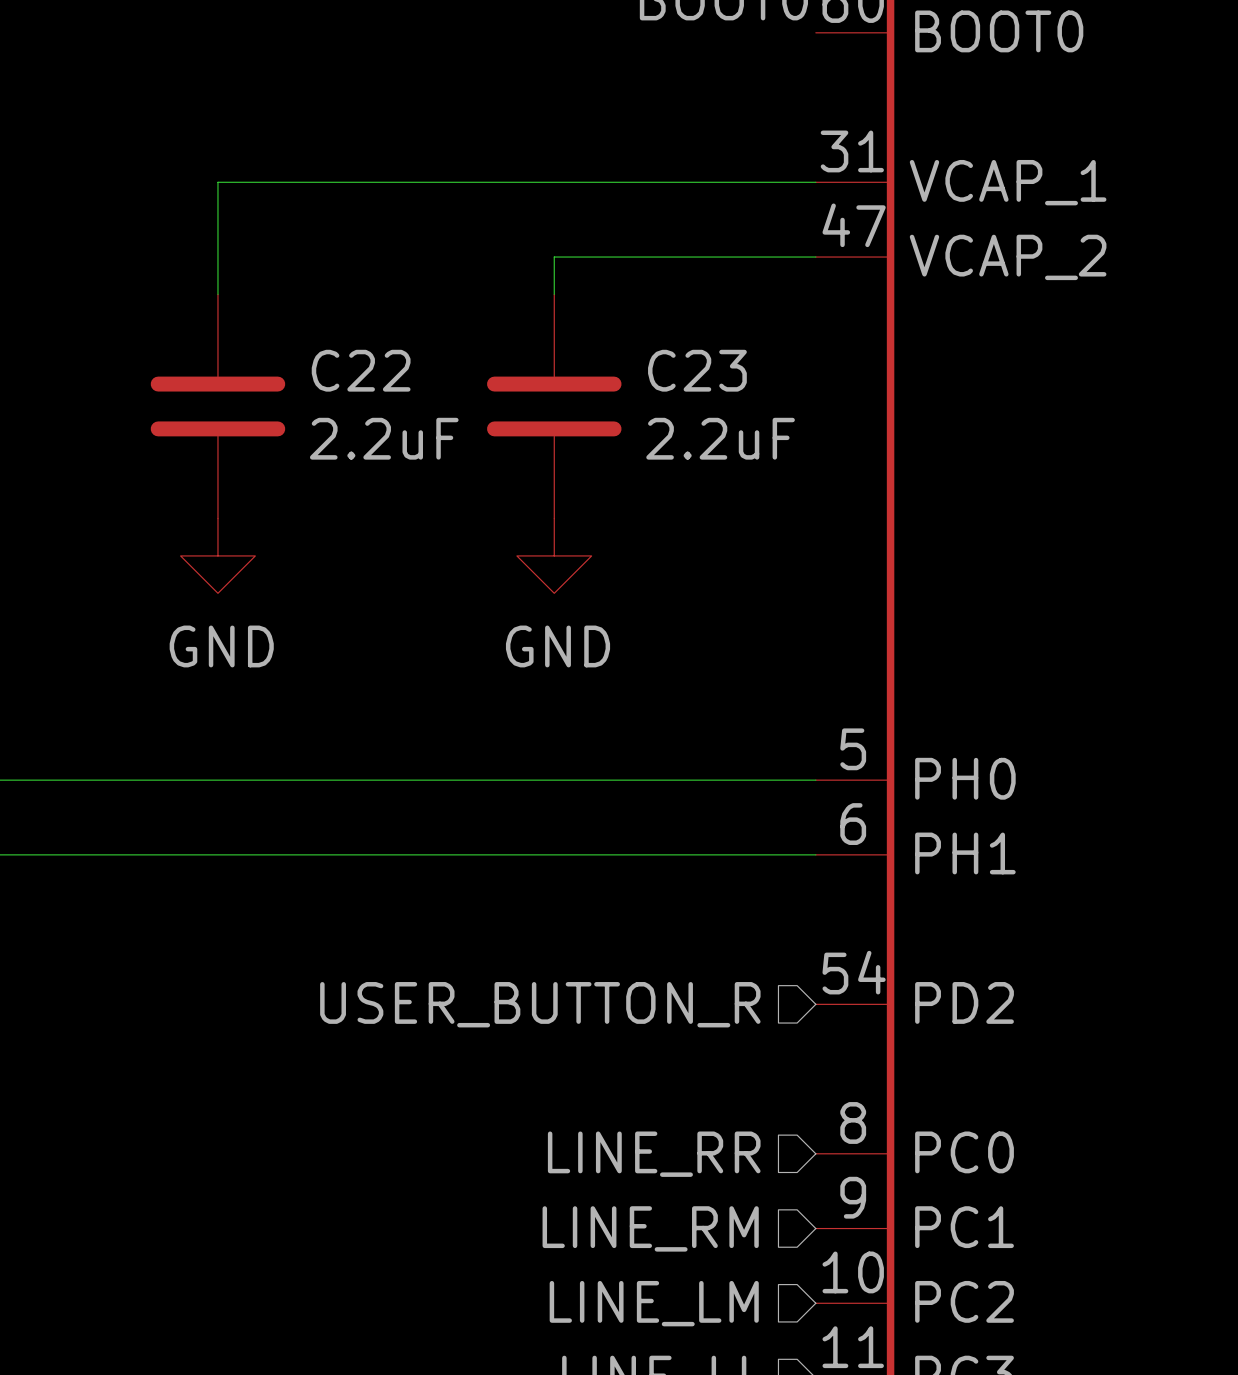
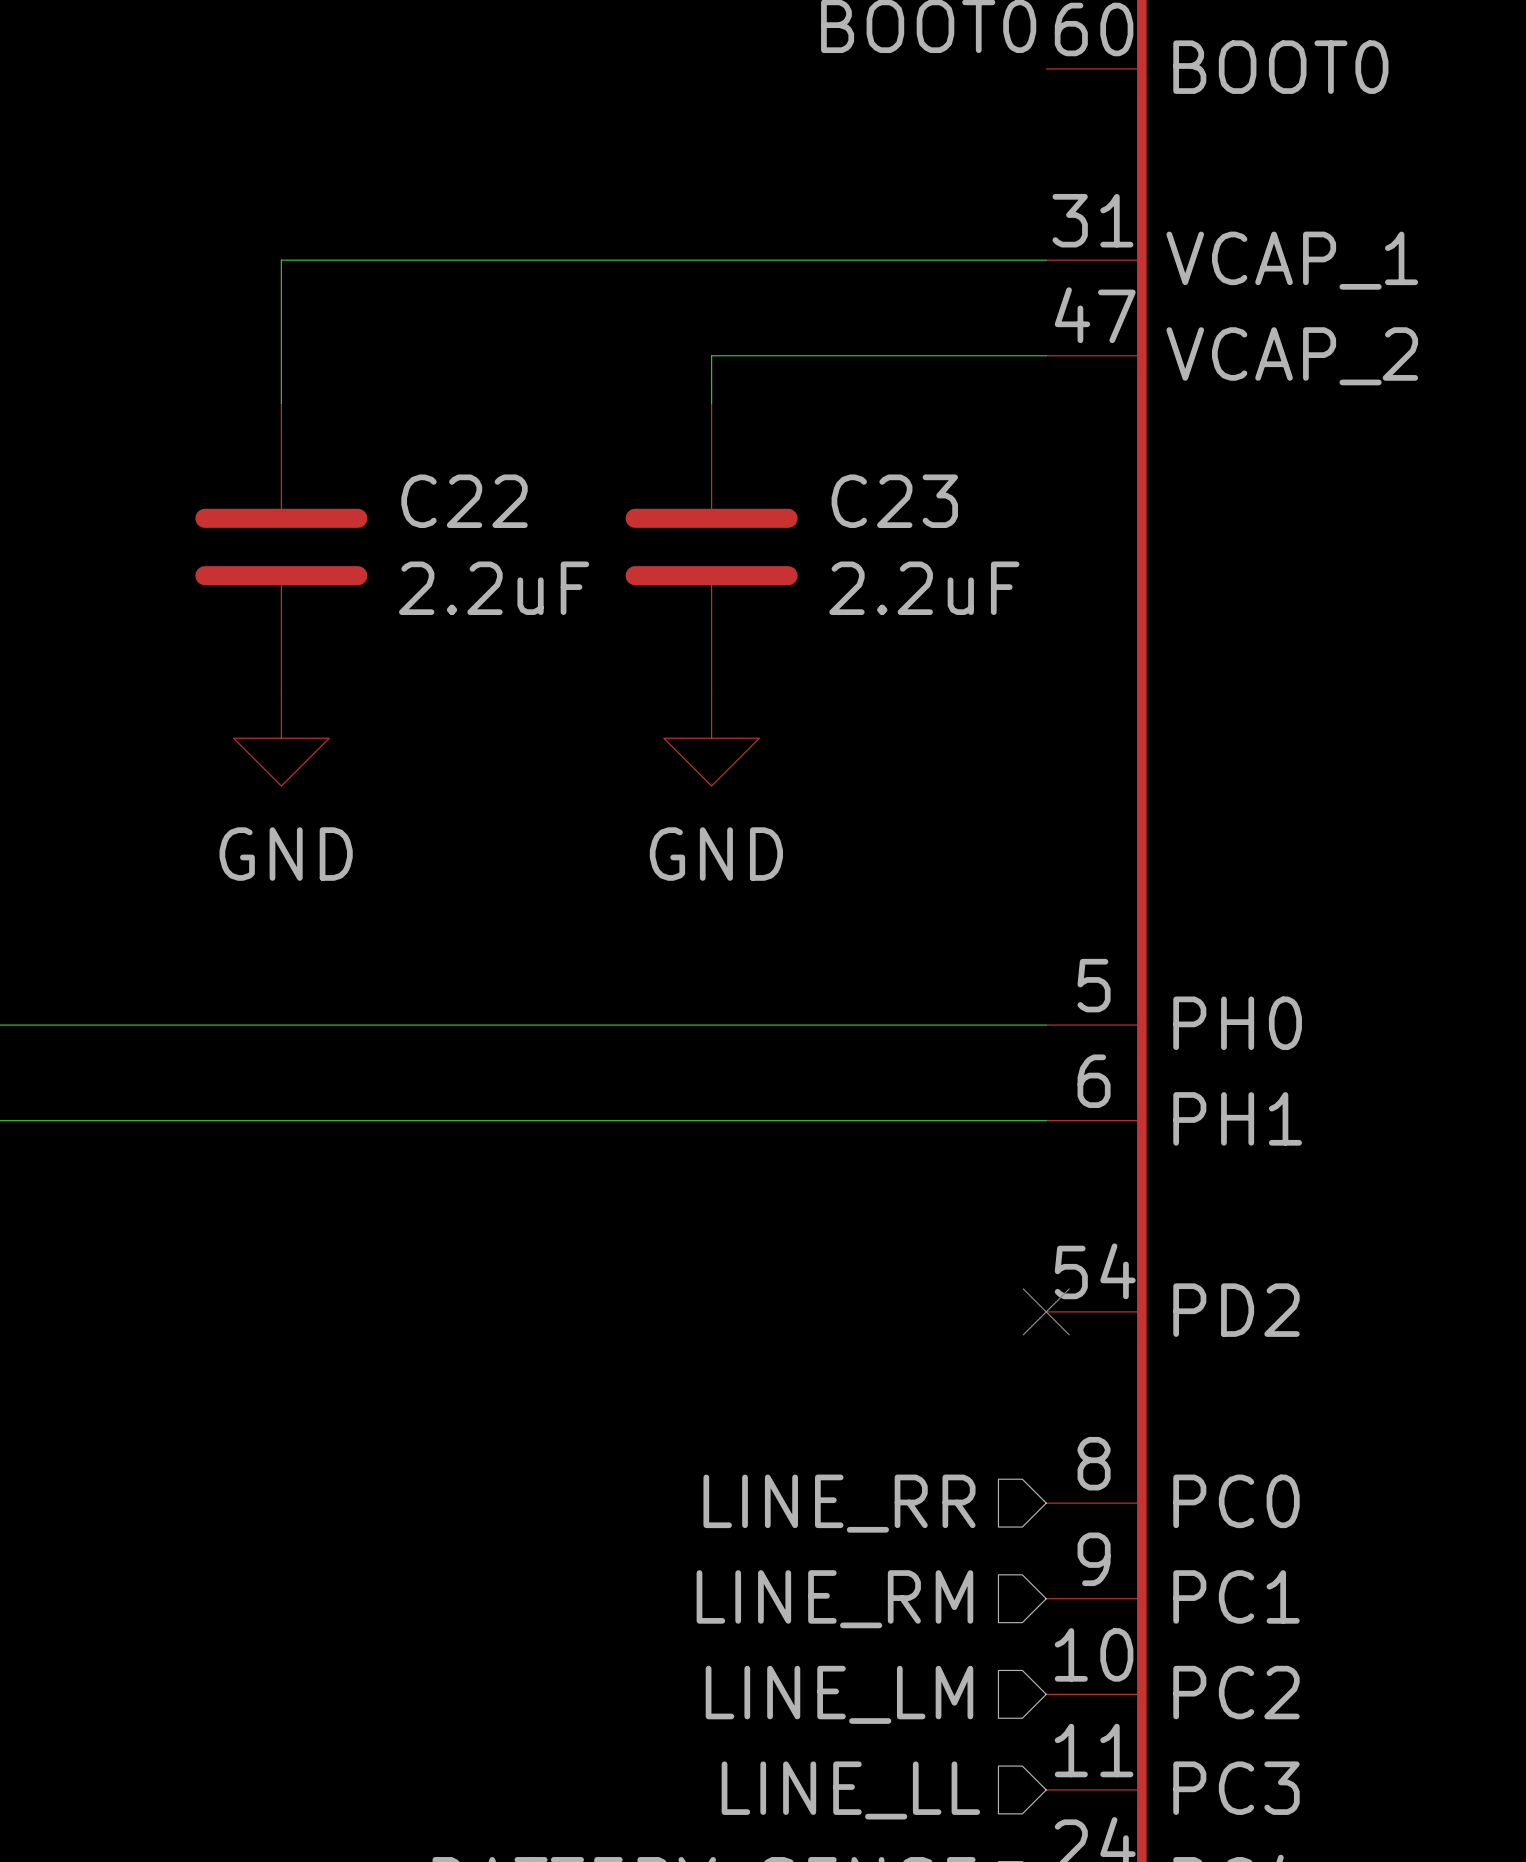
hierarchical label: USER_BUTTON_R (540, 1004) -> none
no-connect mark: none -> (1046, 1311)

